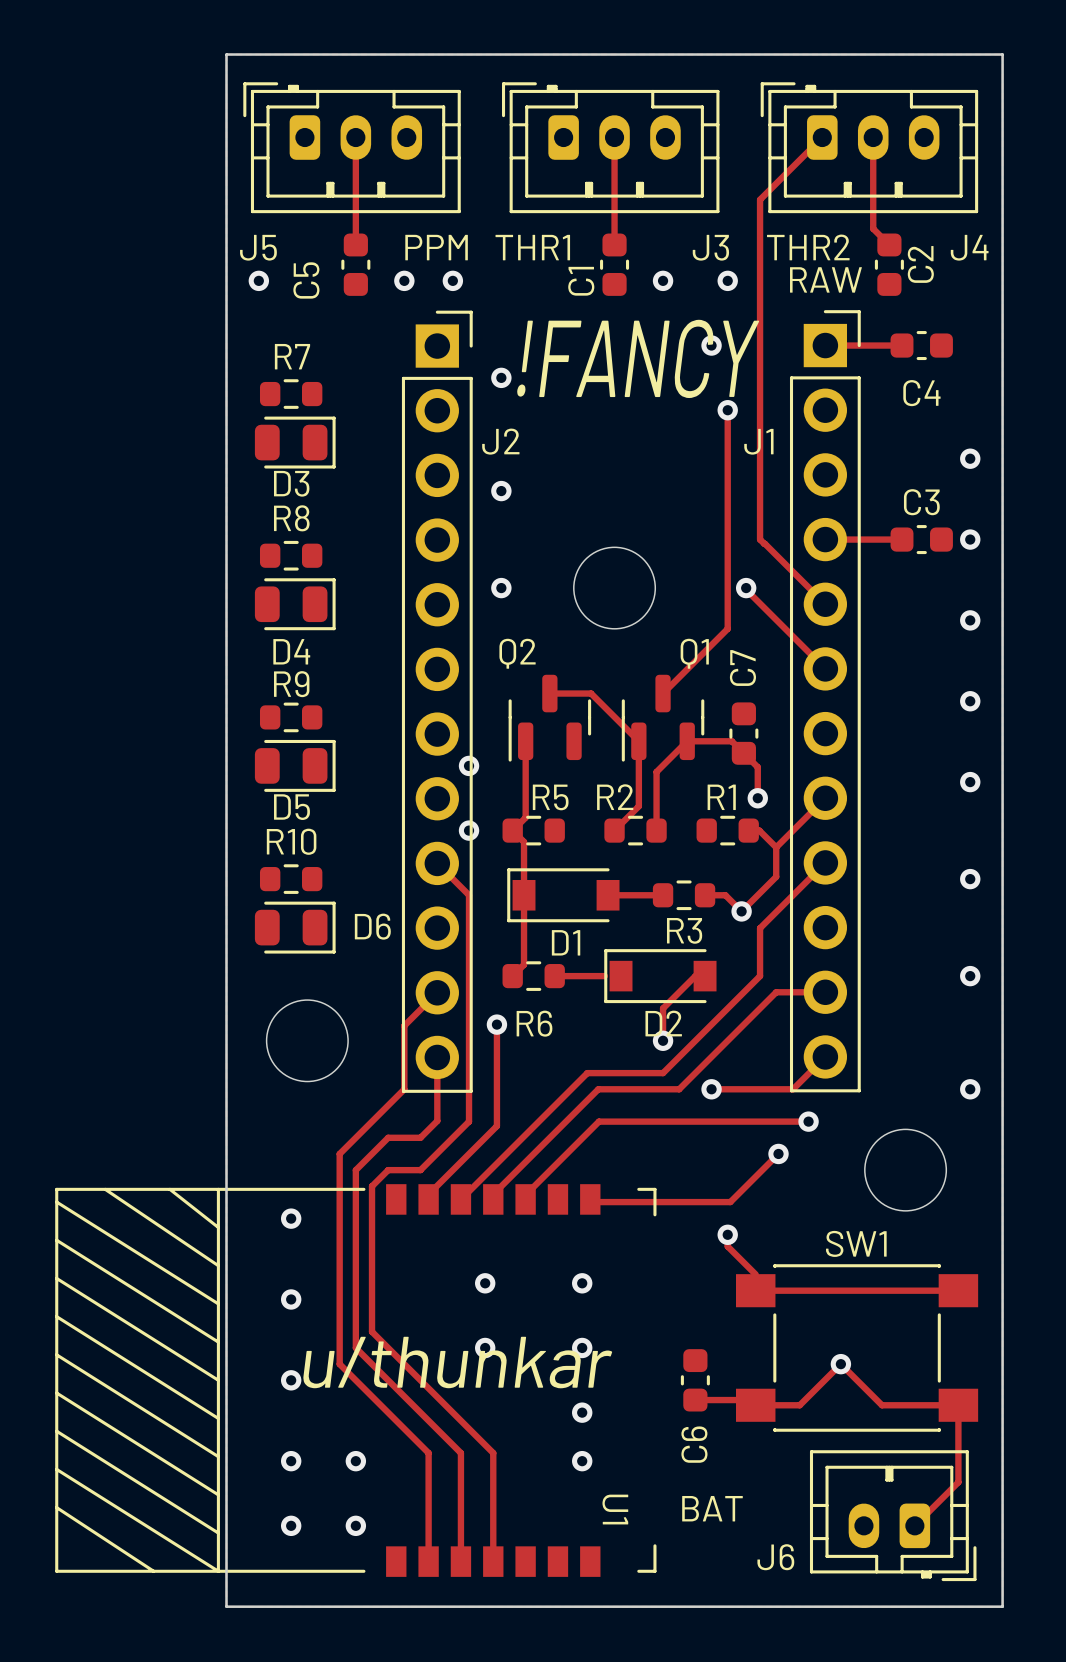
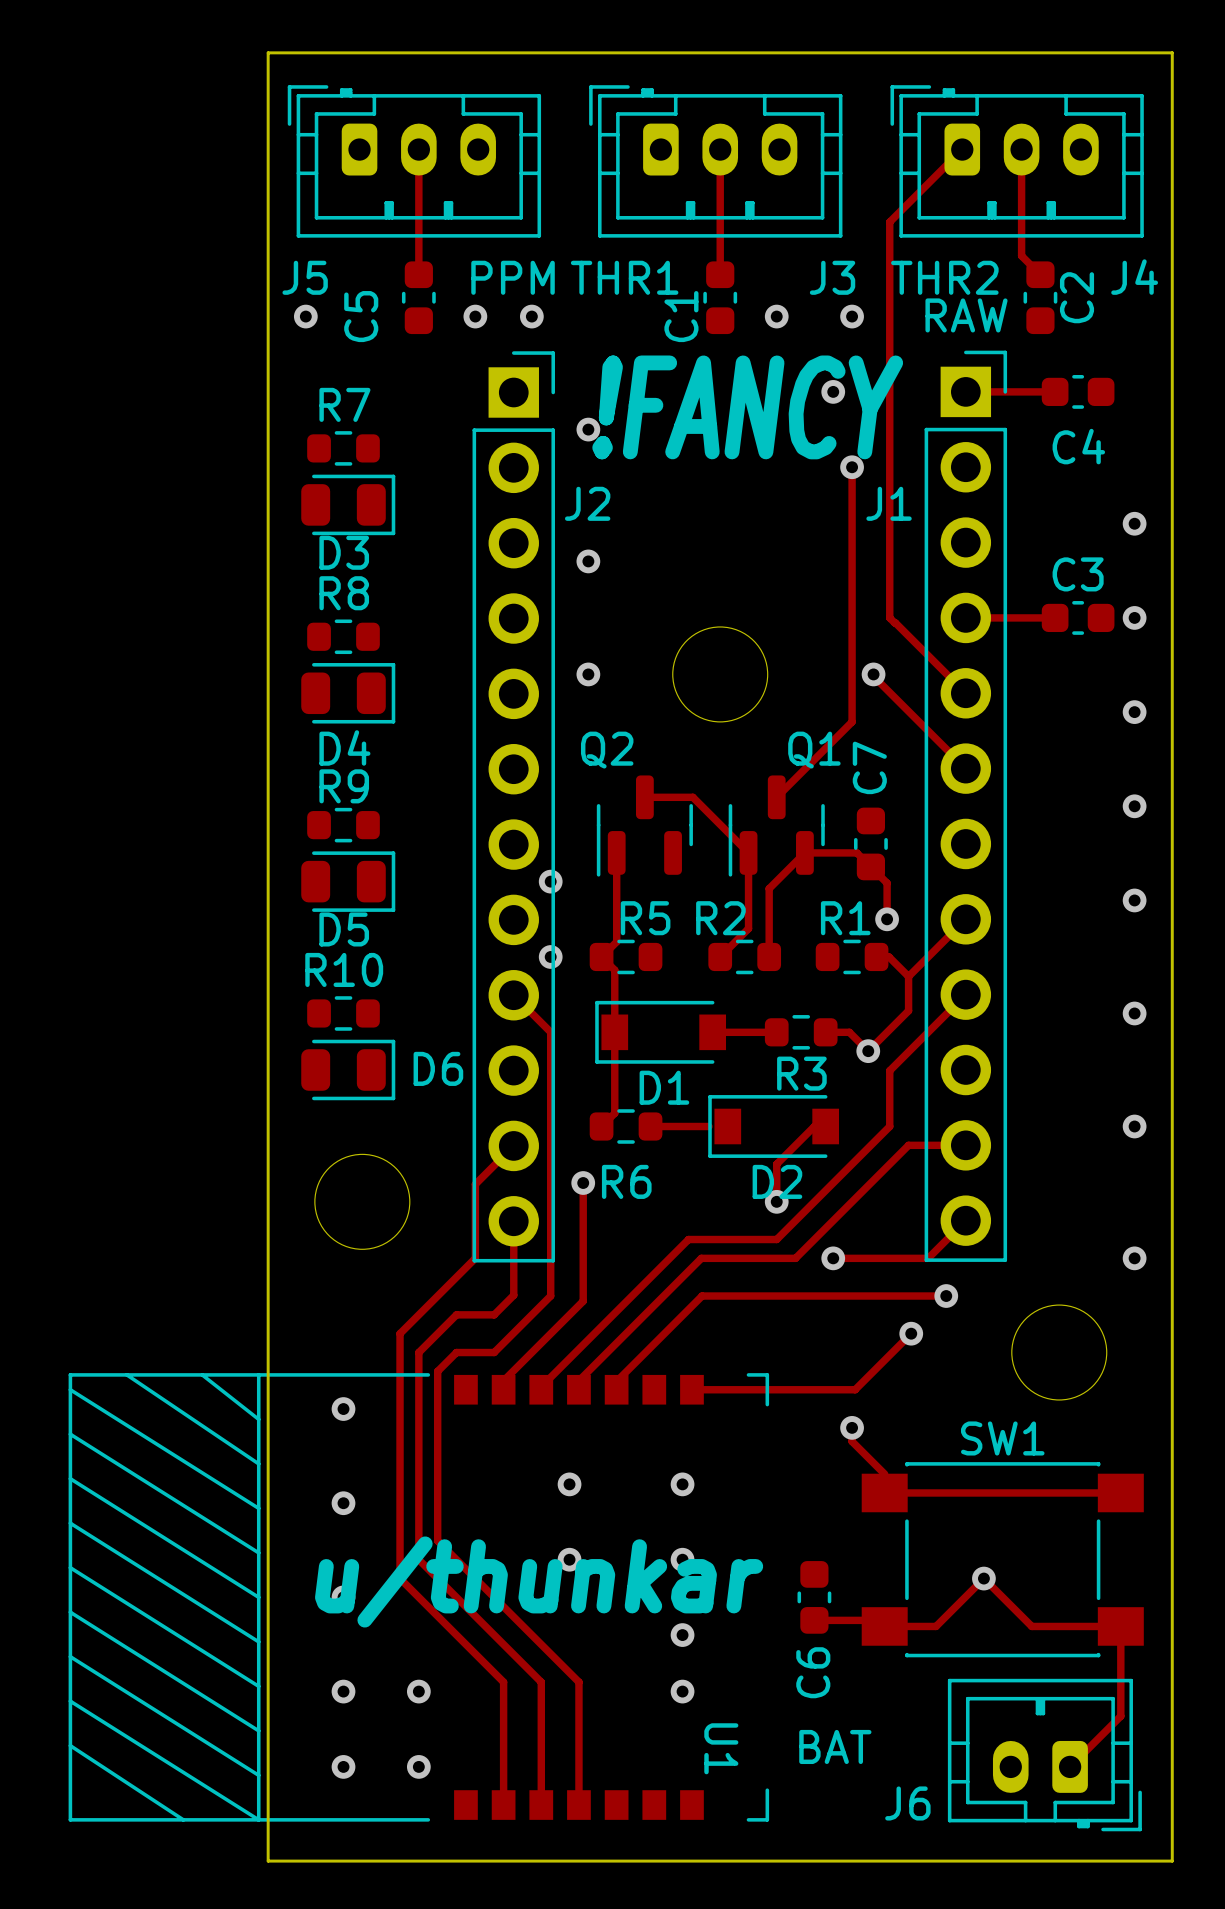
U1 footprint: [55, 1184, 657, 1577] -> [68, 1373, 770, 1822]

